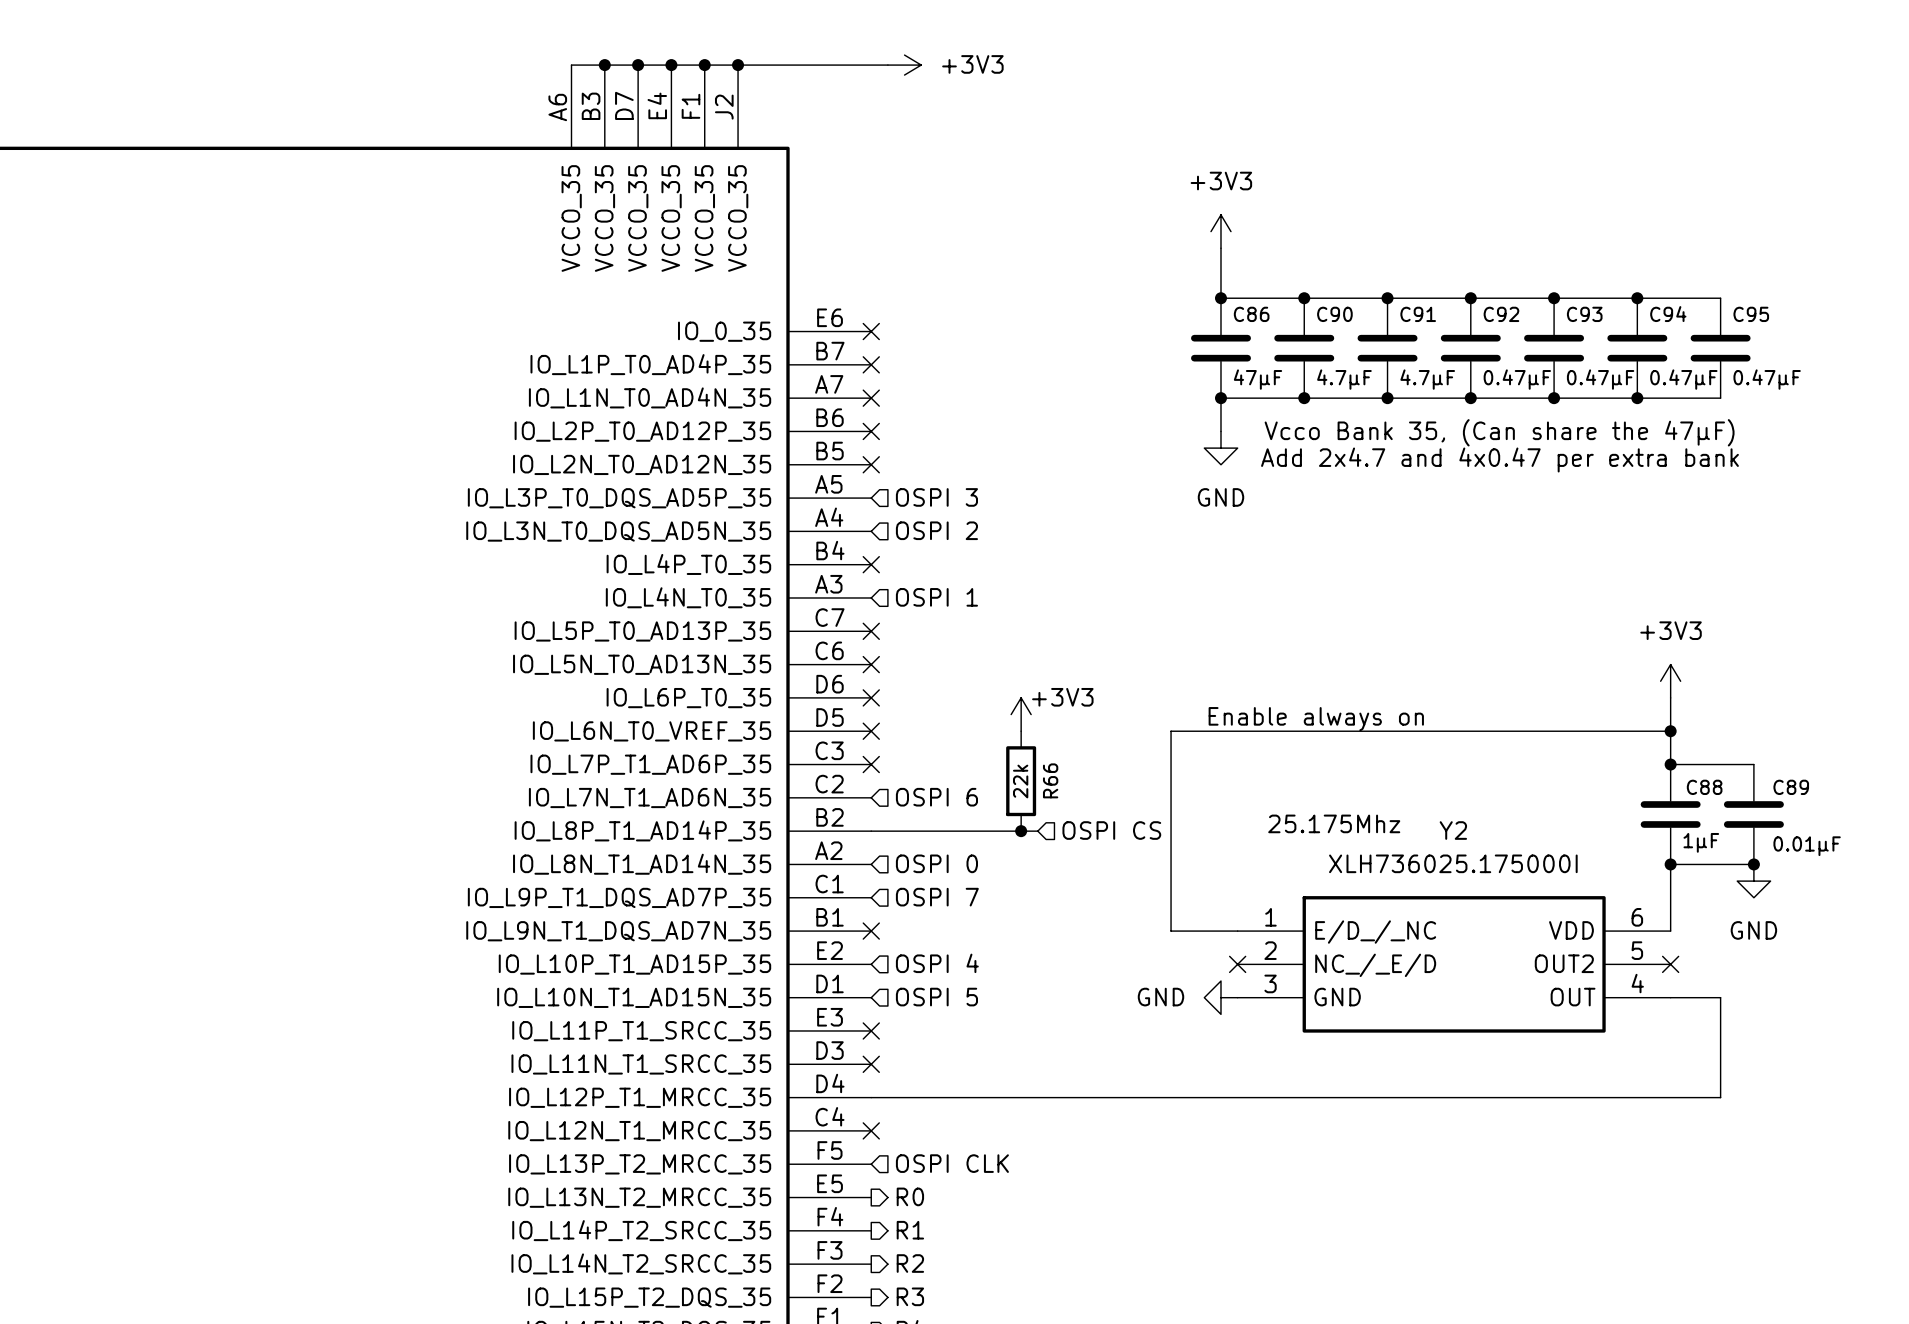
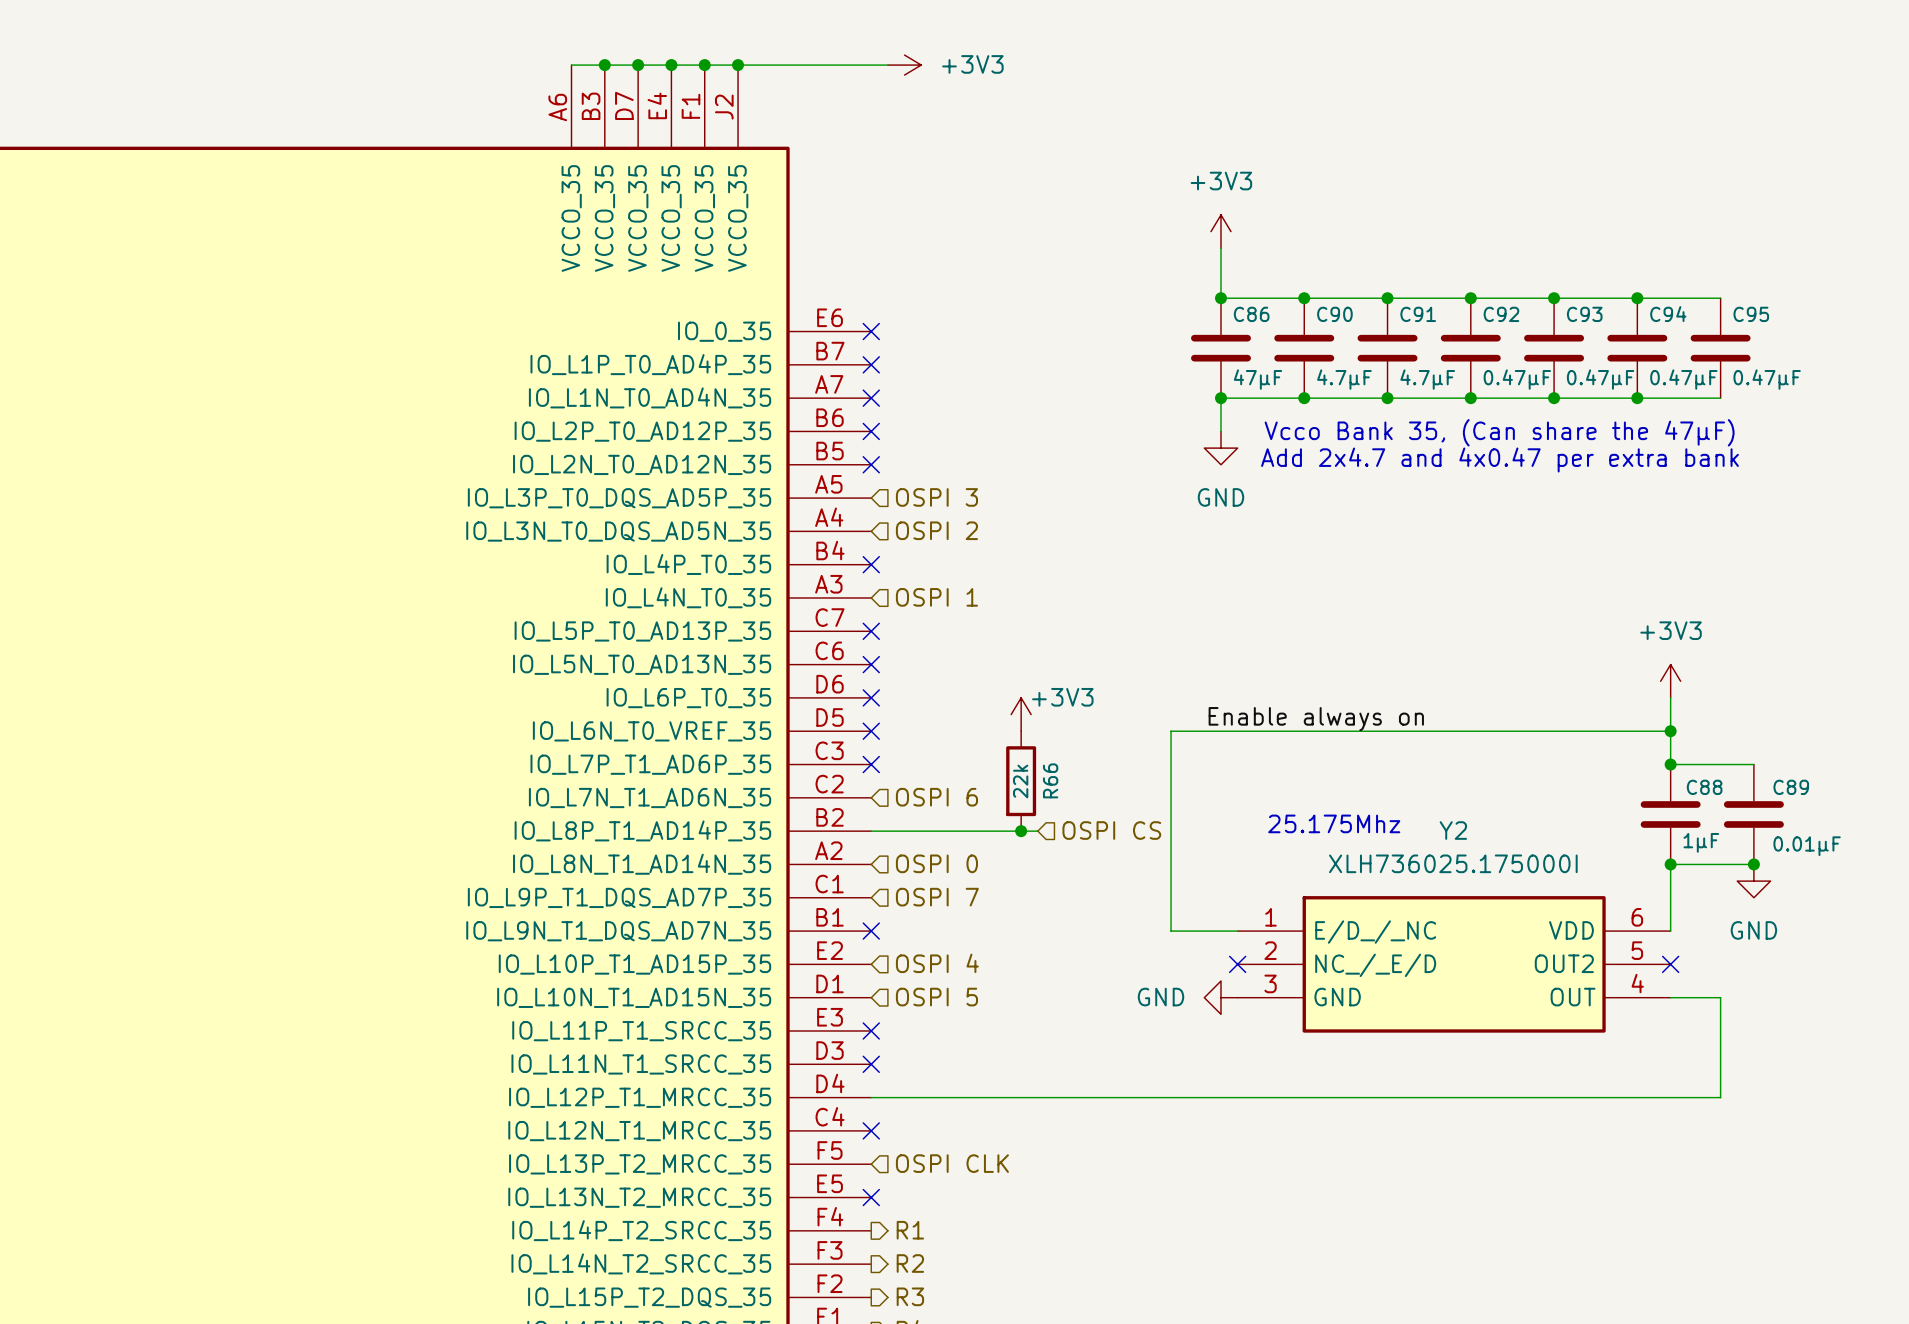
hierarchical label: R0 (910, 1196) -> none
no-connect mark: none -> (871, 1197)

